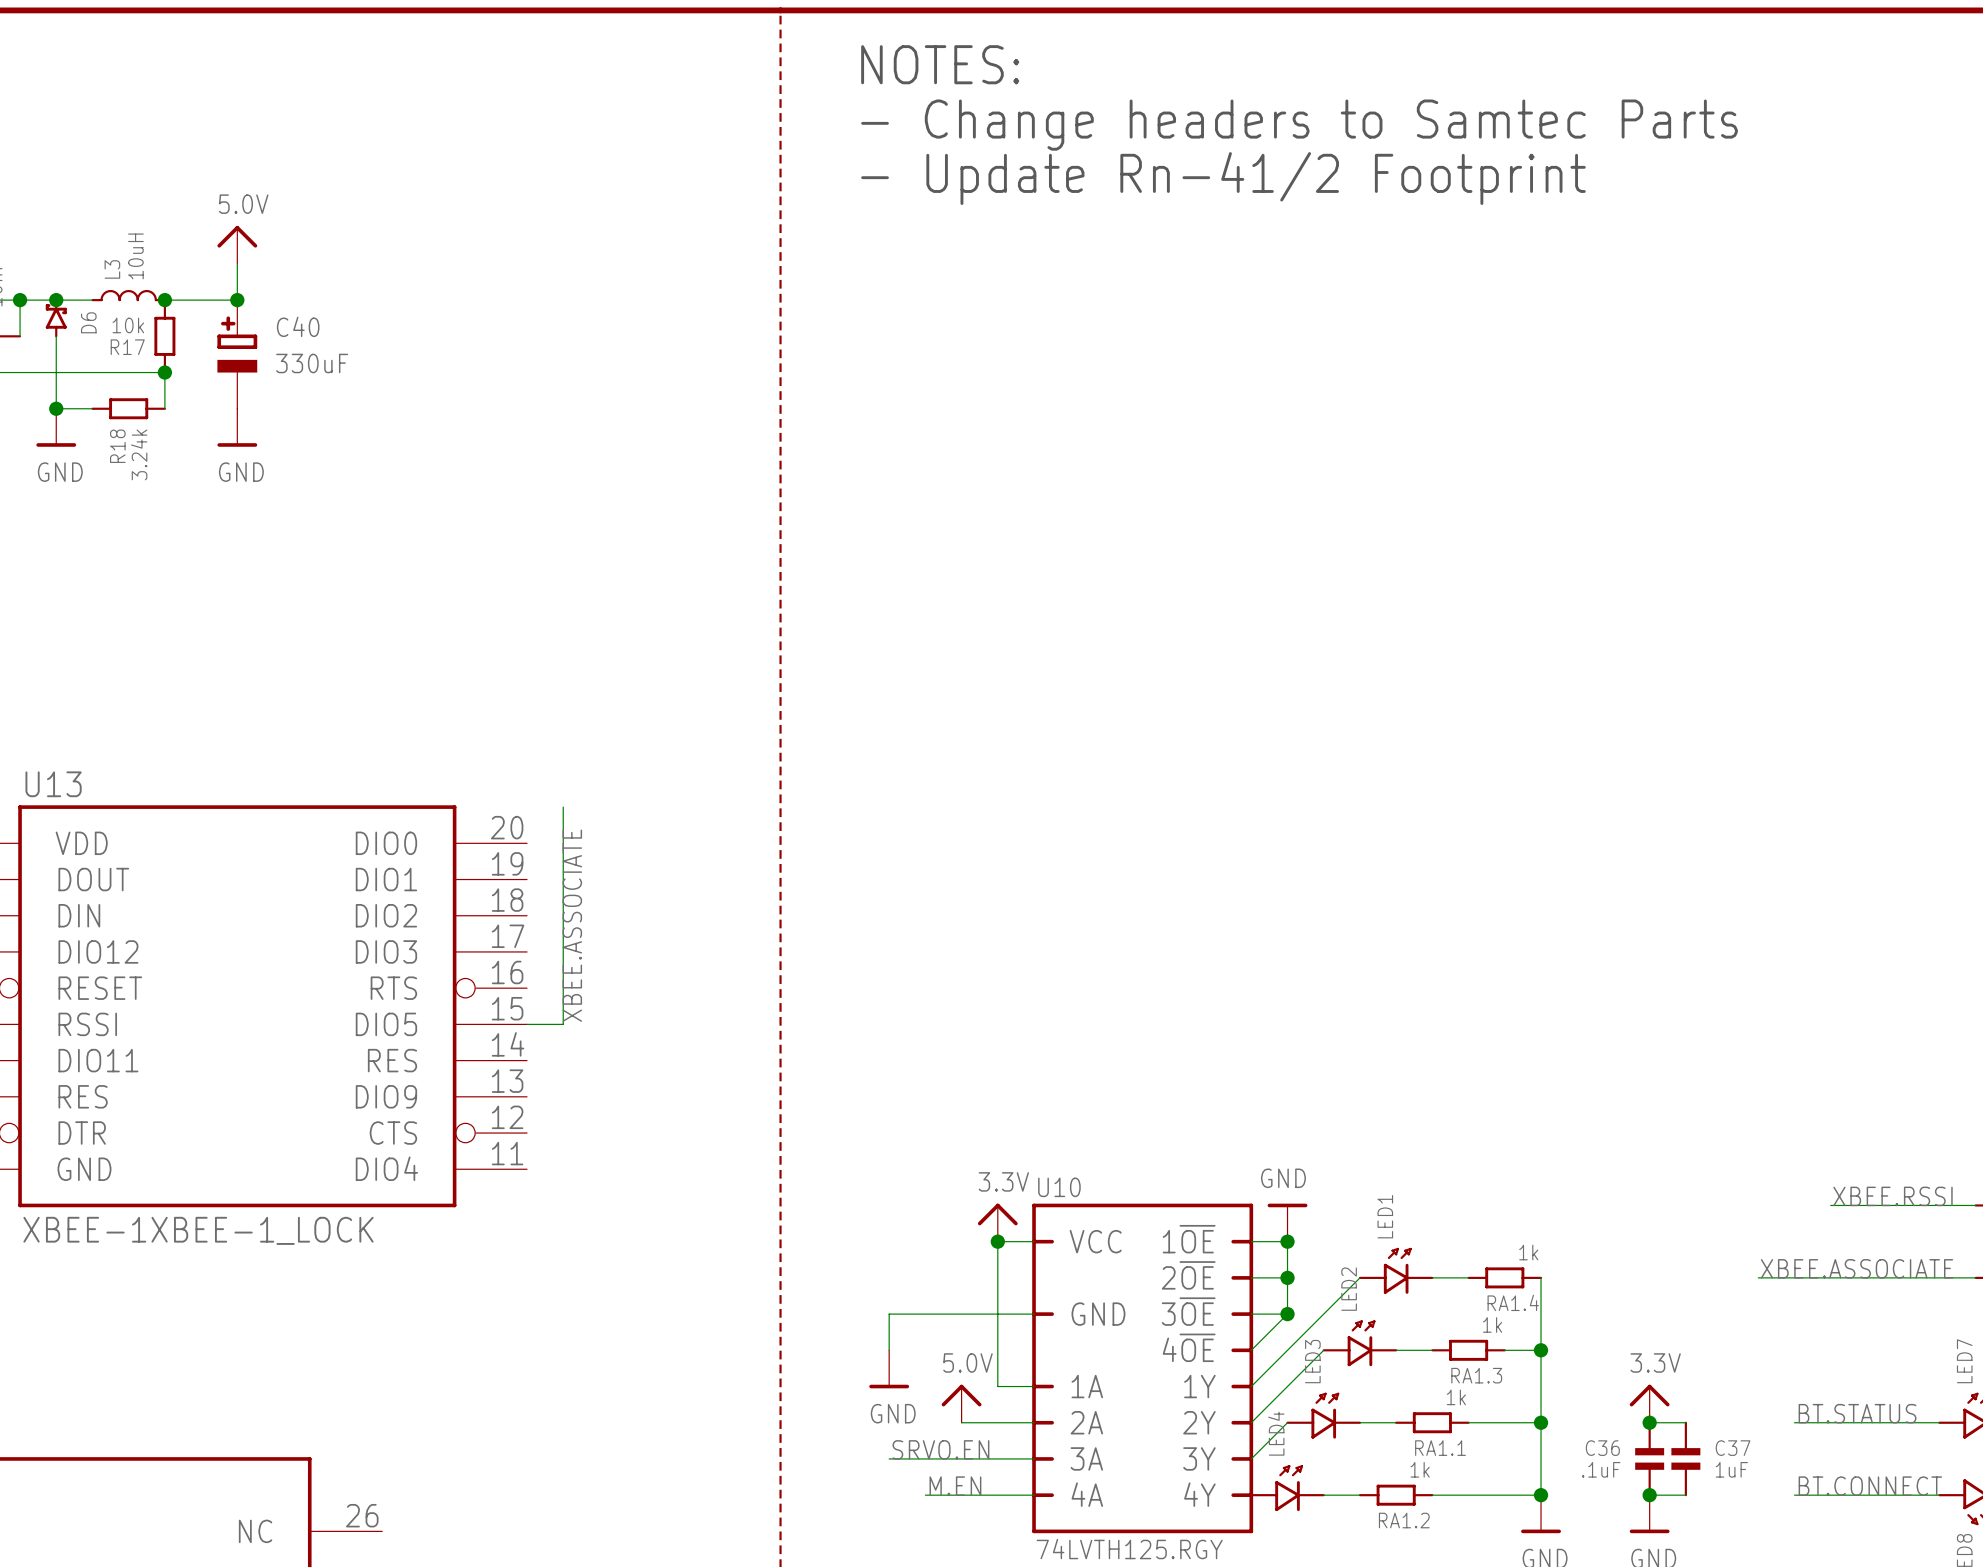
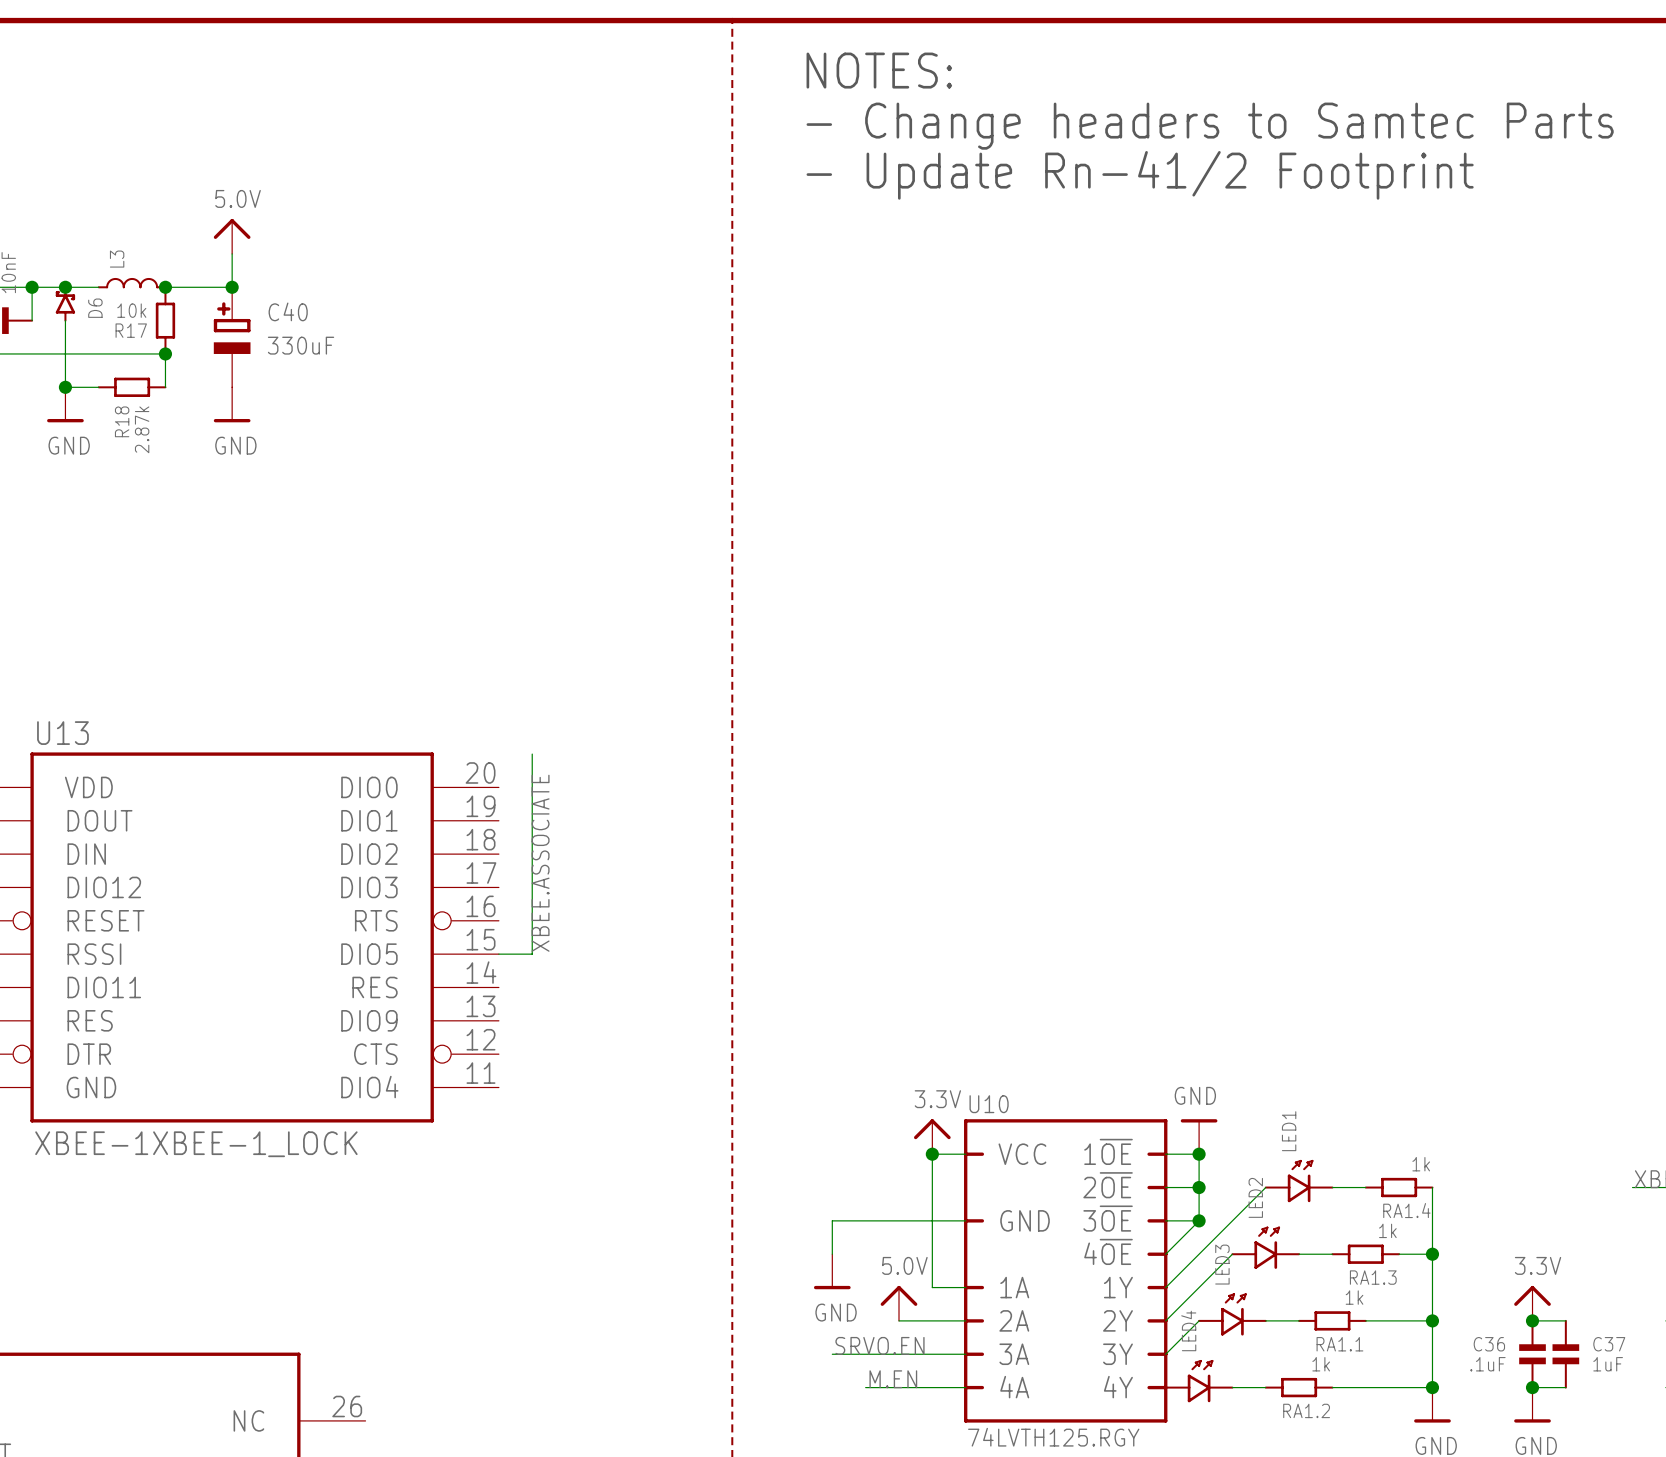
L3 value: 10uH (135, 256) -> none
R18 value: 3.24k (139, 454) -> 2.87k (142, 429)

